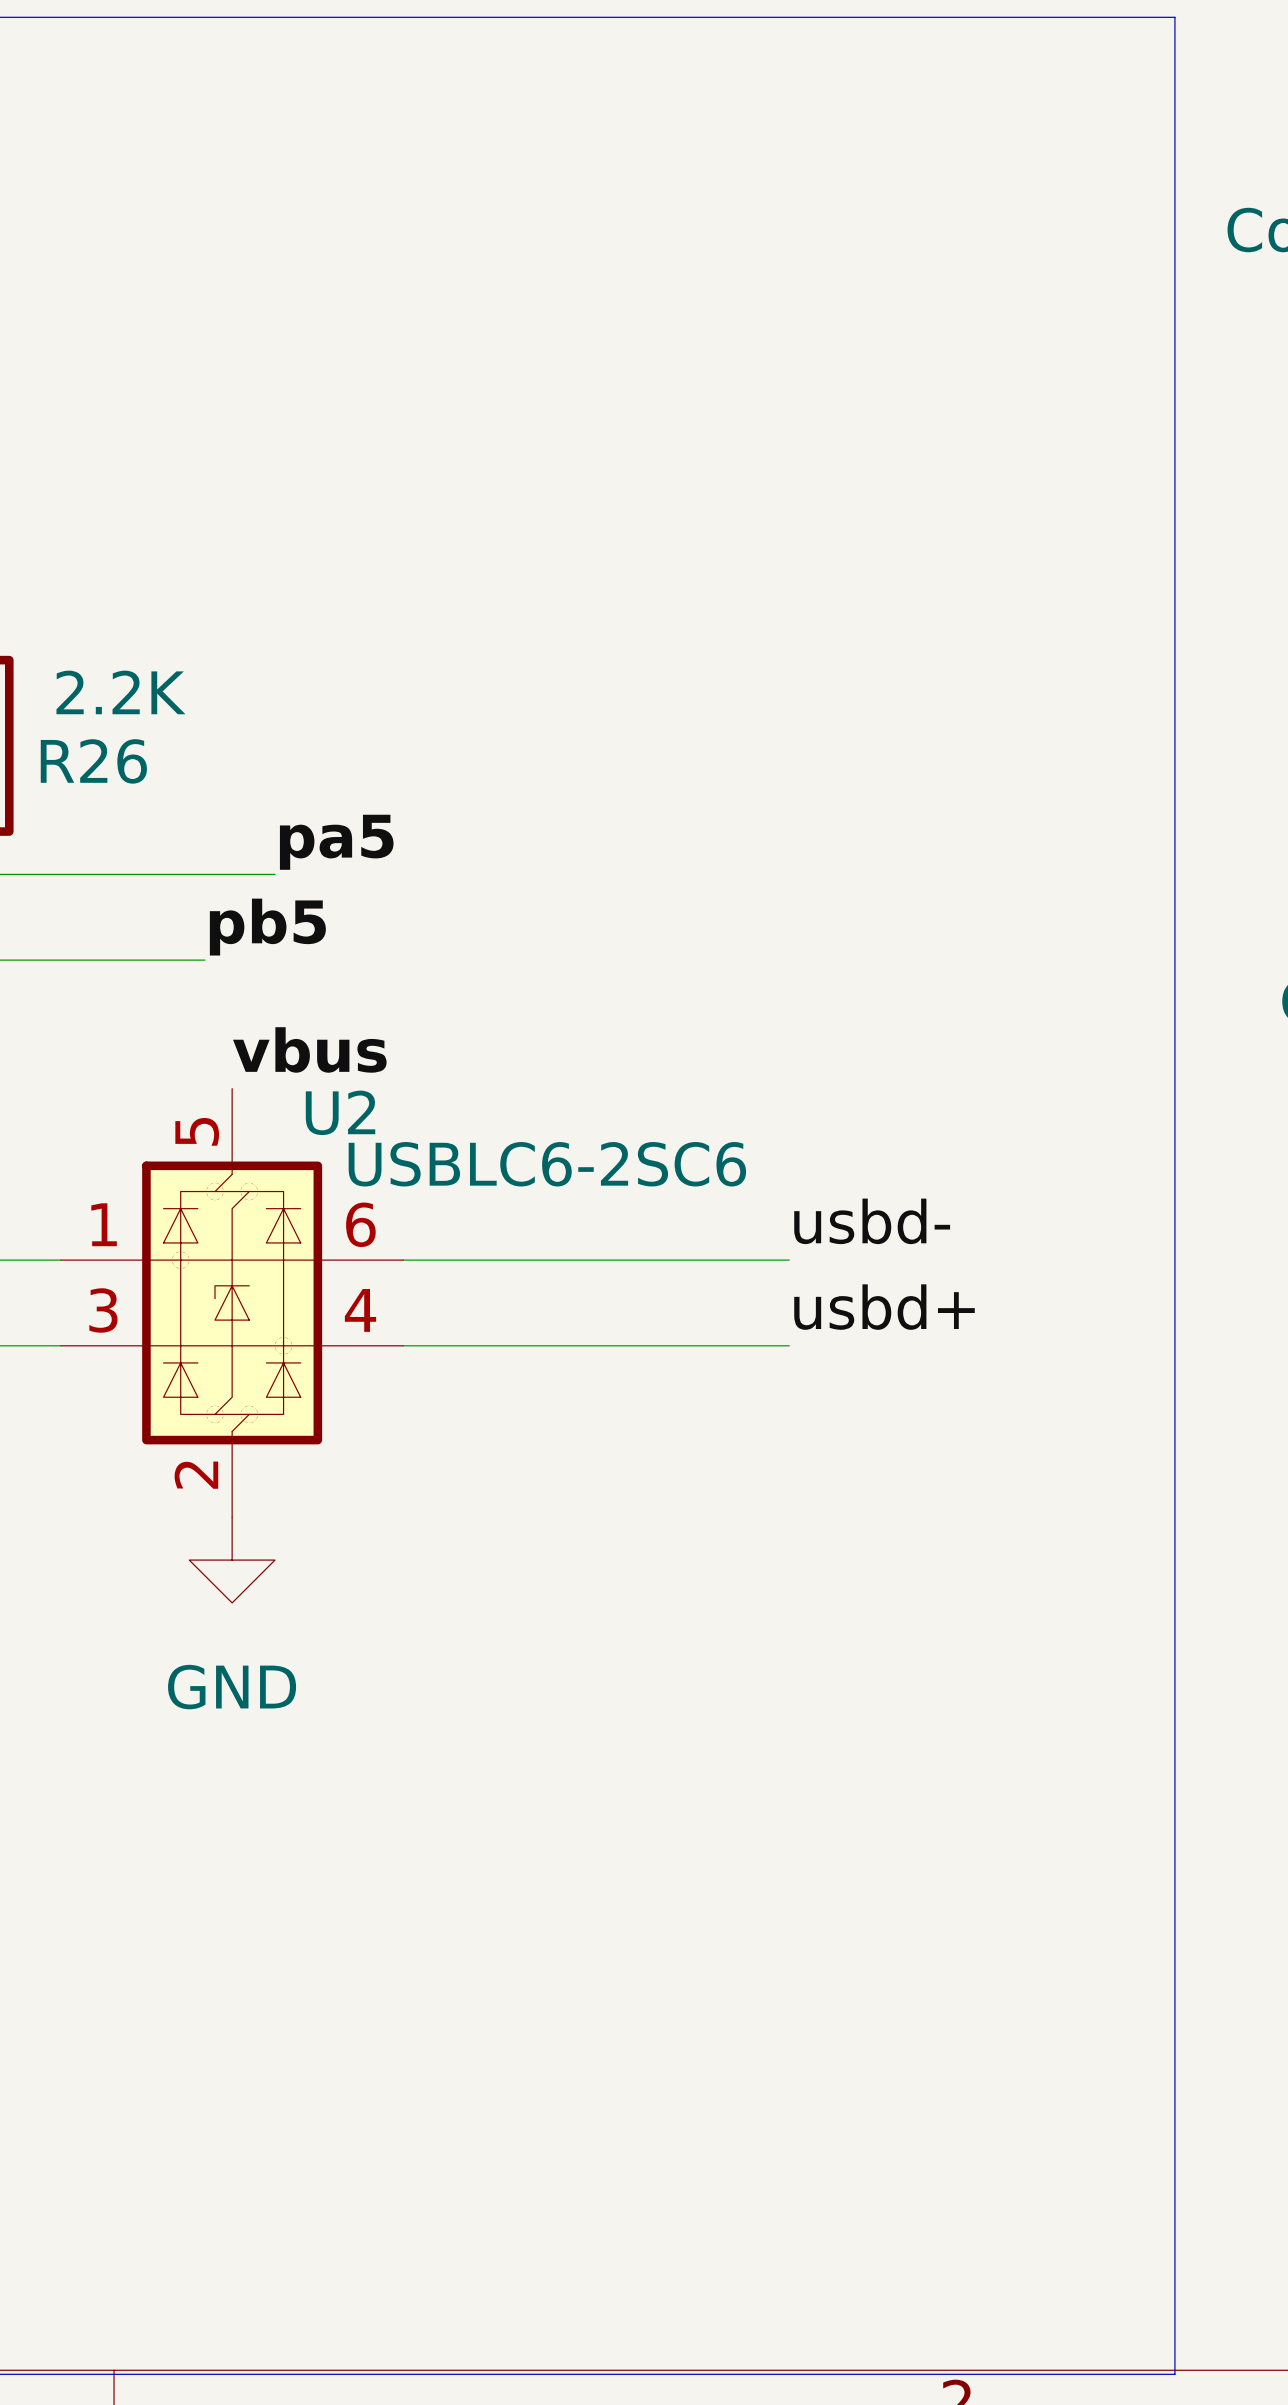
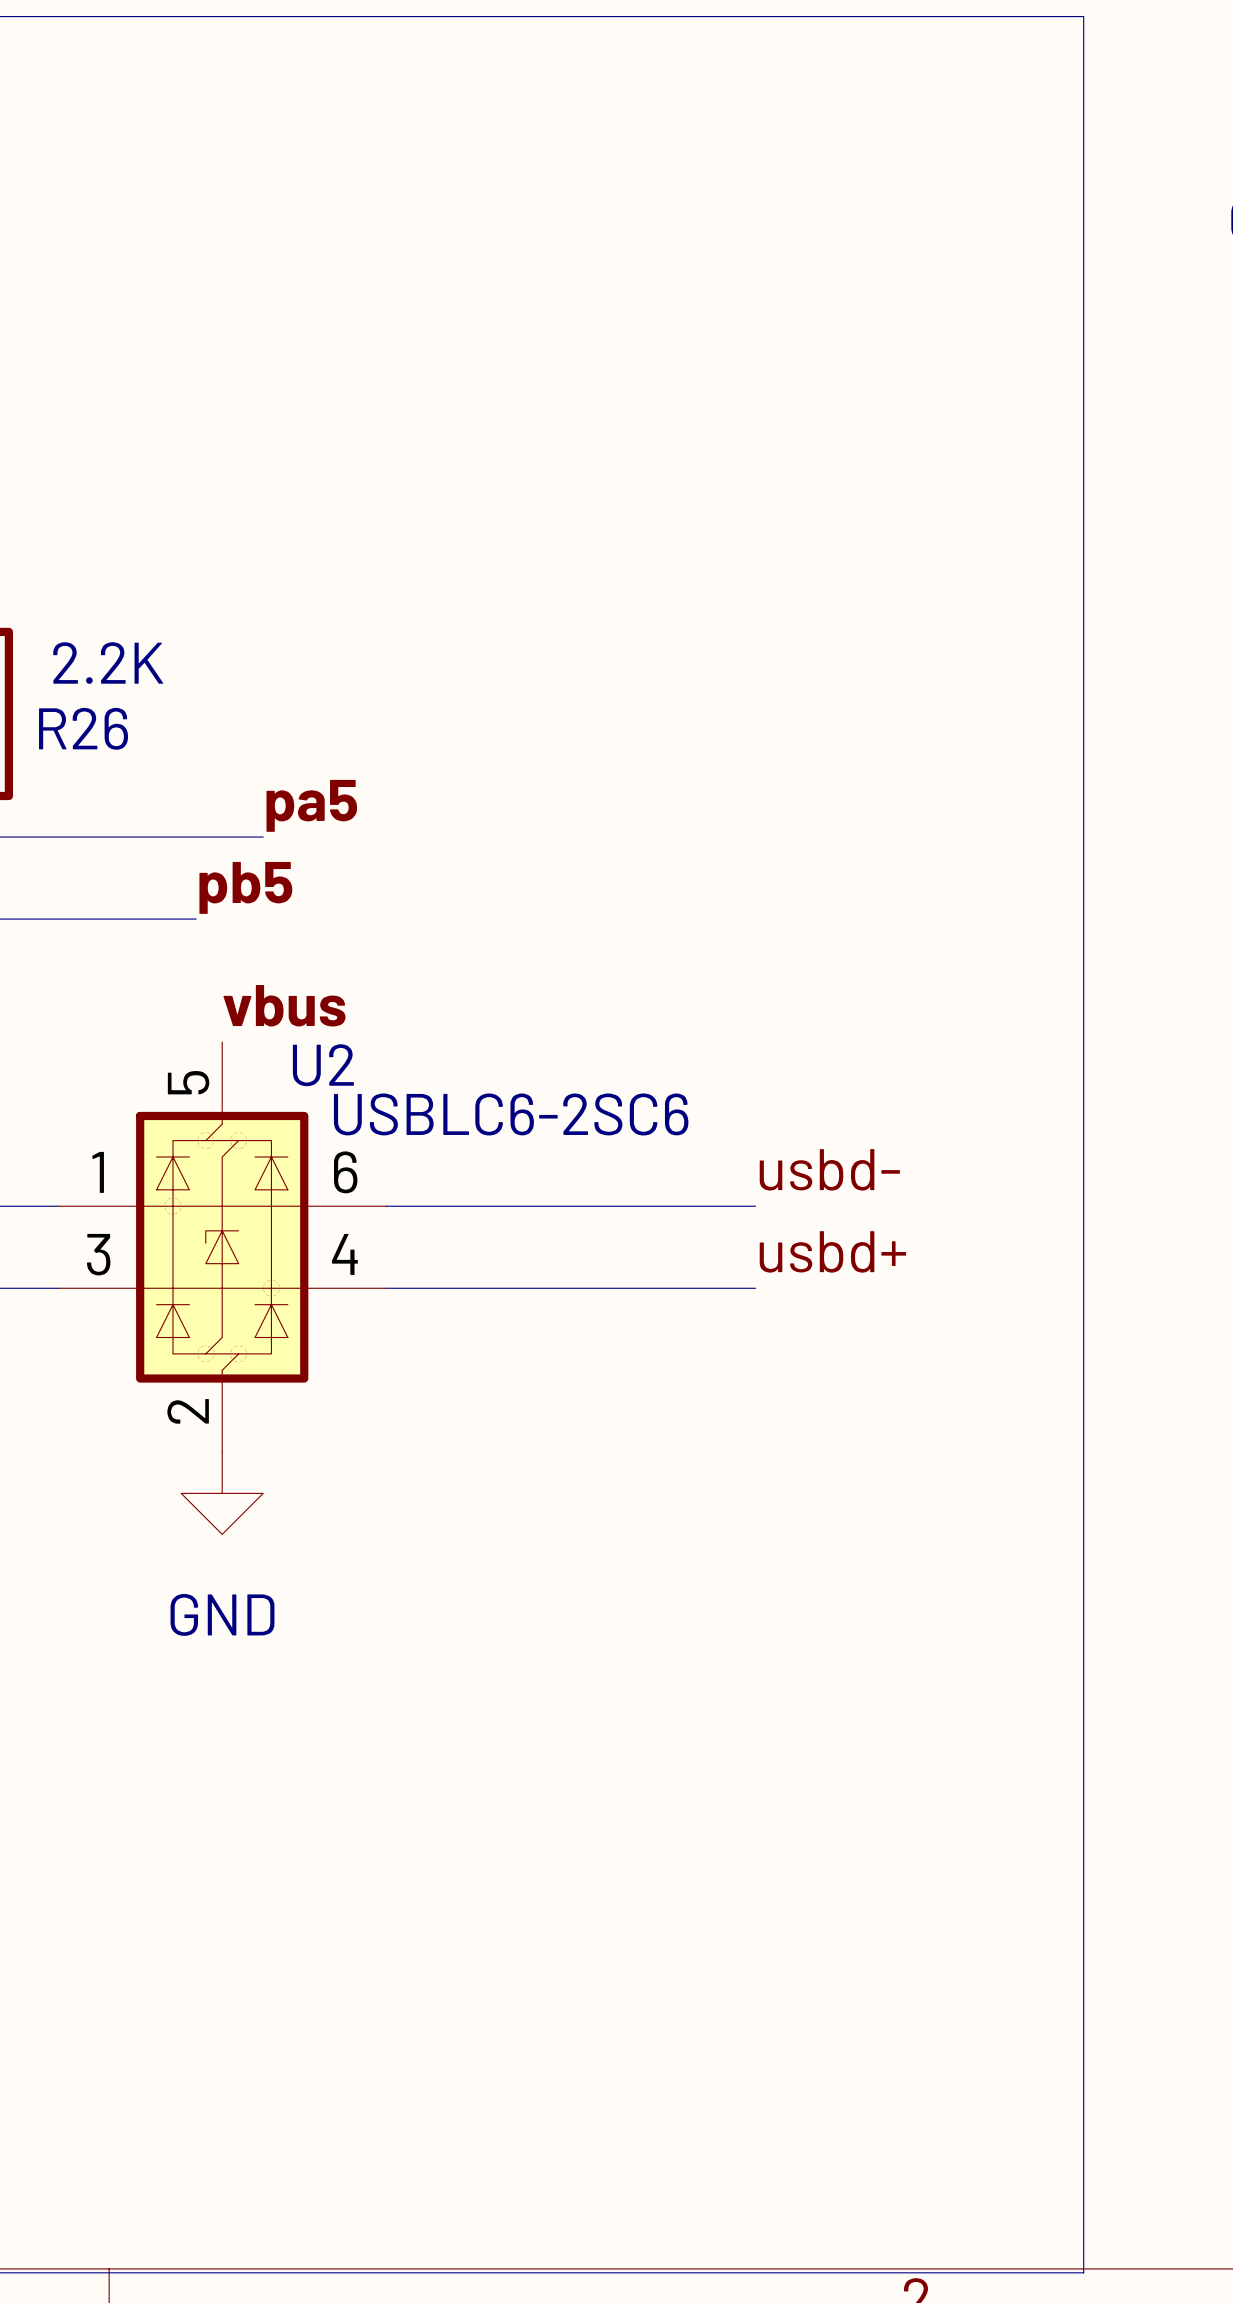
line: (1132, 17) (1174, 17) (1174, 2374) (1132, 2374) -> (1083, 16) (1083, 2272)

